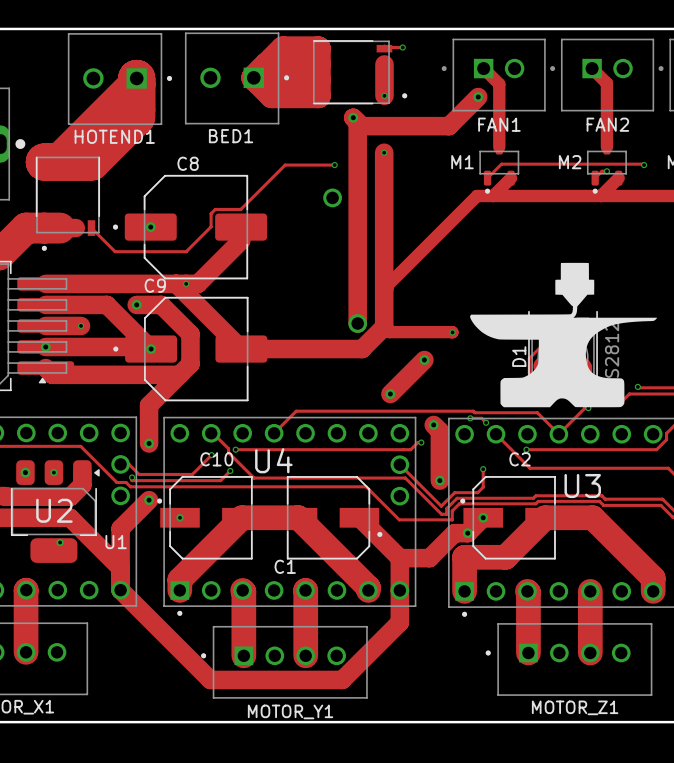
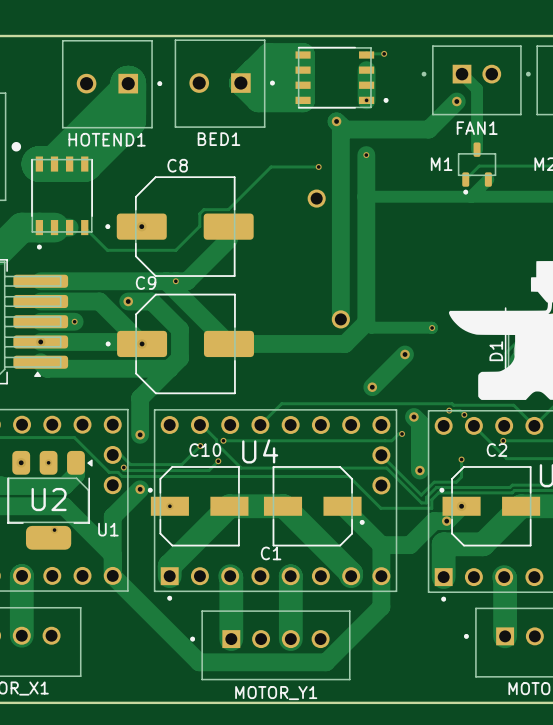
track: (477, 196) (384, 288) -> (455, 196) (366, 196)

